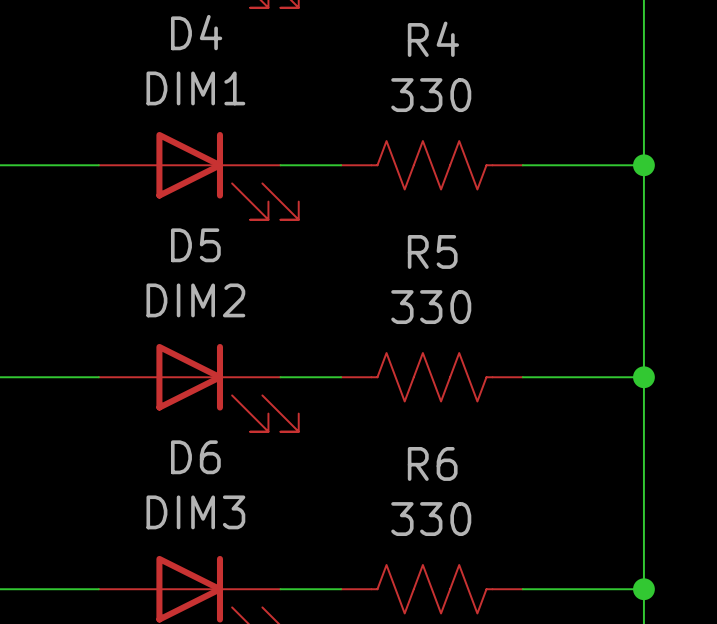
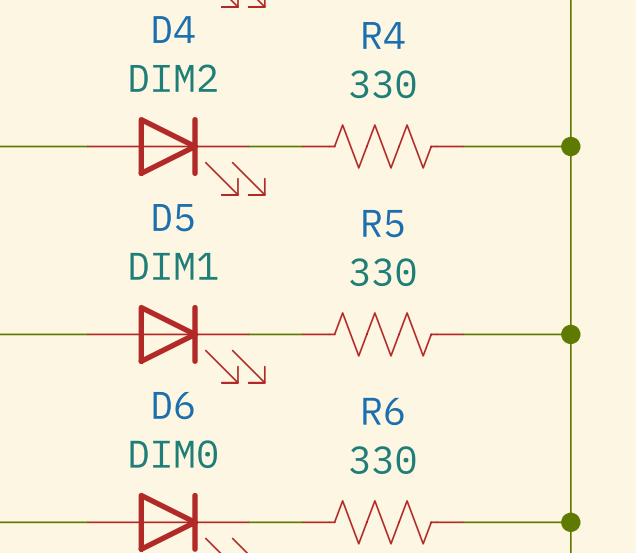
D4 value: DIM1 (195, 88) -> DIM2 (173, 78)
D5 value: DIM2 (195, 300) -> DIM1 (173, 266)
D6 value: DIM3 (195, 512) -> DIM0 (173, 454)

